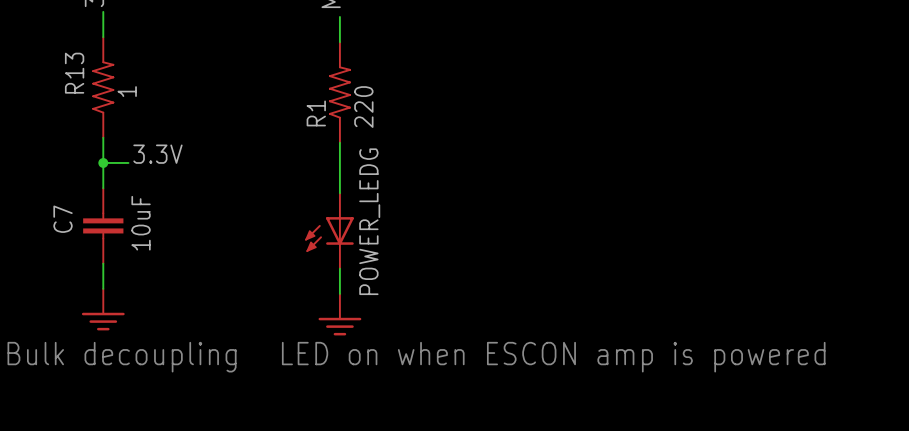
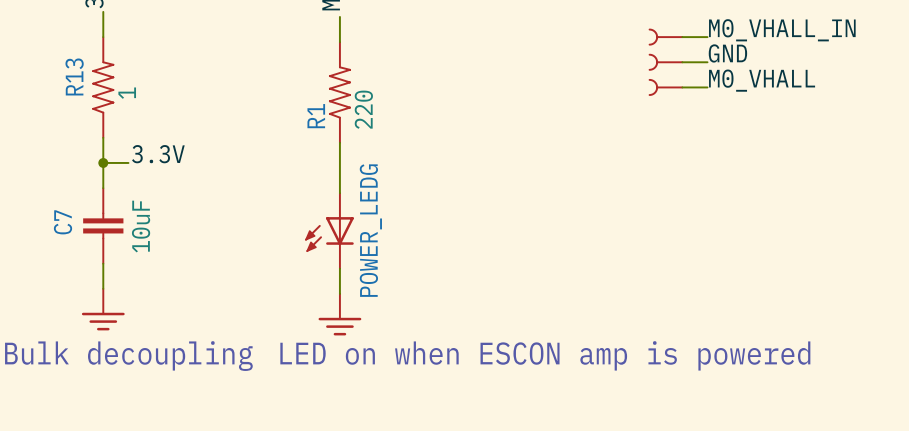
label: none -> M0_VHALL_IN (782, 30)
part: none -> (665, 37)
wire: none -> (682, 37) (707, 37)
label: none -> GND (727, 53)
part: none -> (665, 62)
wire: none -> (682, 62) (707, 62)
label: none -> M0_VHALL (762, 80)
part: none -> (665, 87)
wire: none -> (682, 87) (707, 87)

